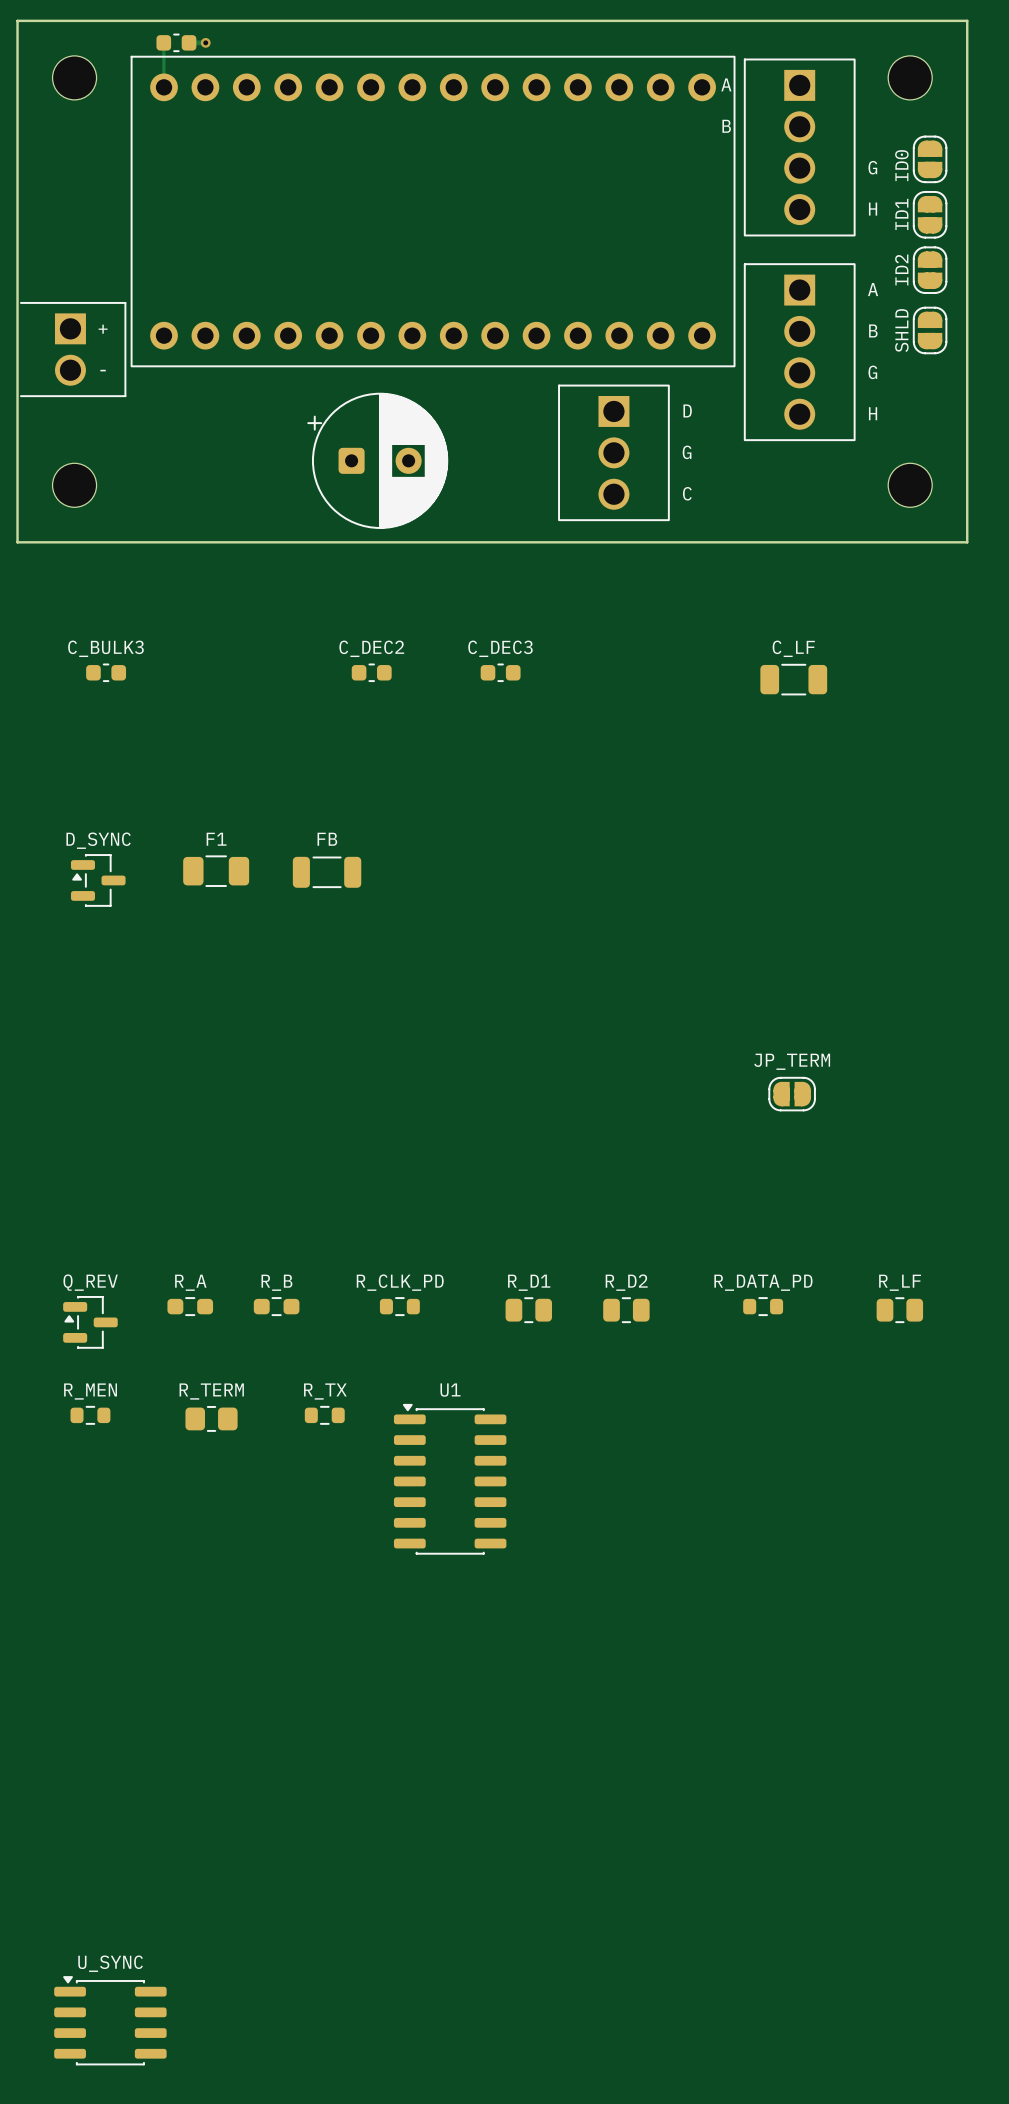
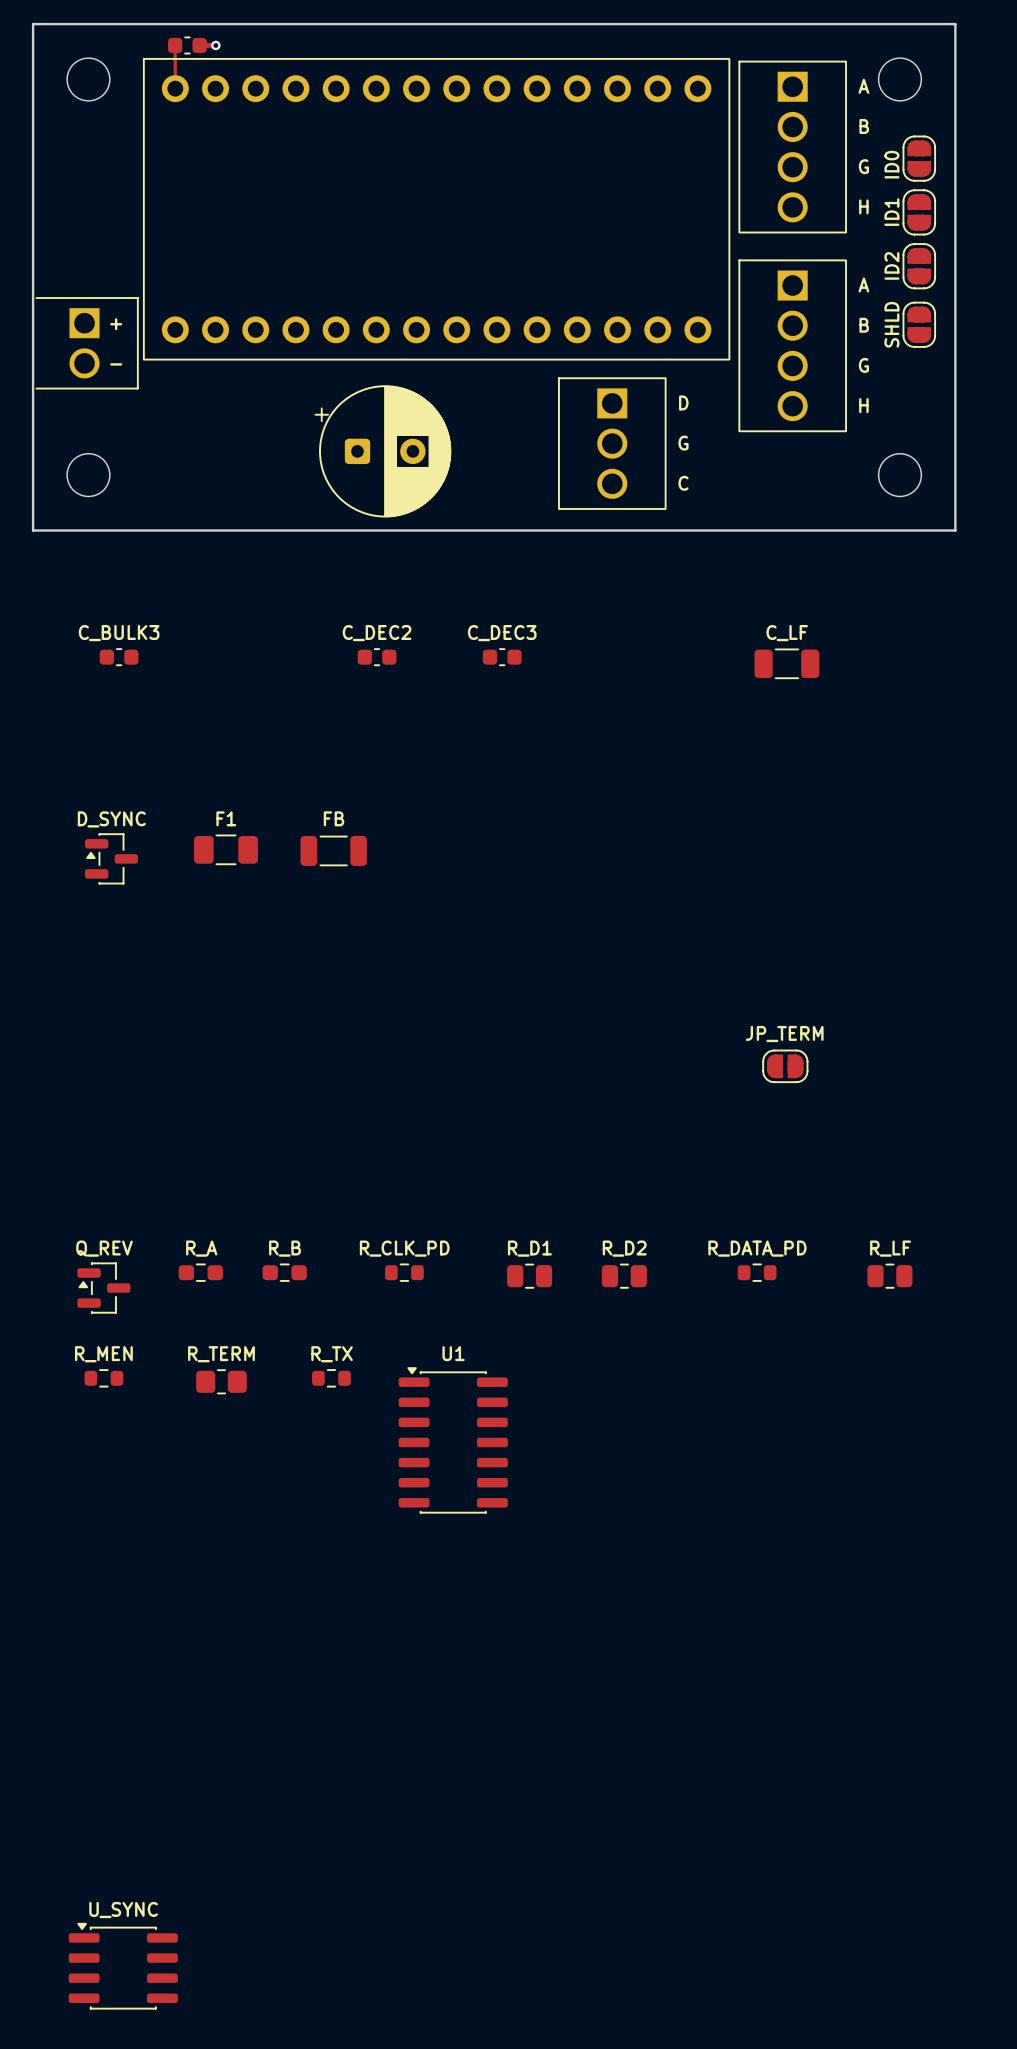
text position: A (726, 84) -> A (863, 86)
text position: B (726, 126) -> B (864, 126)

